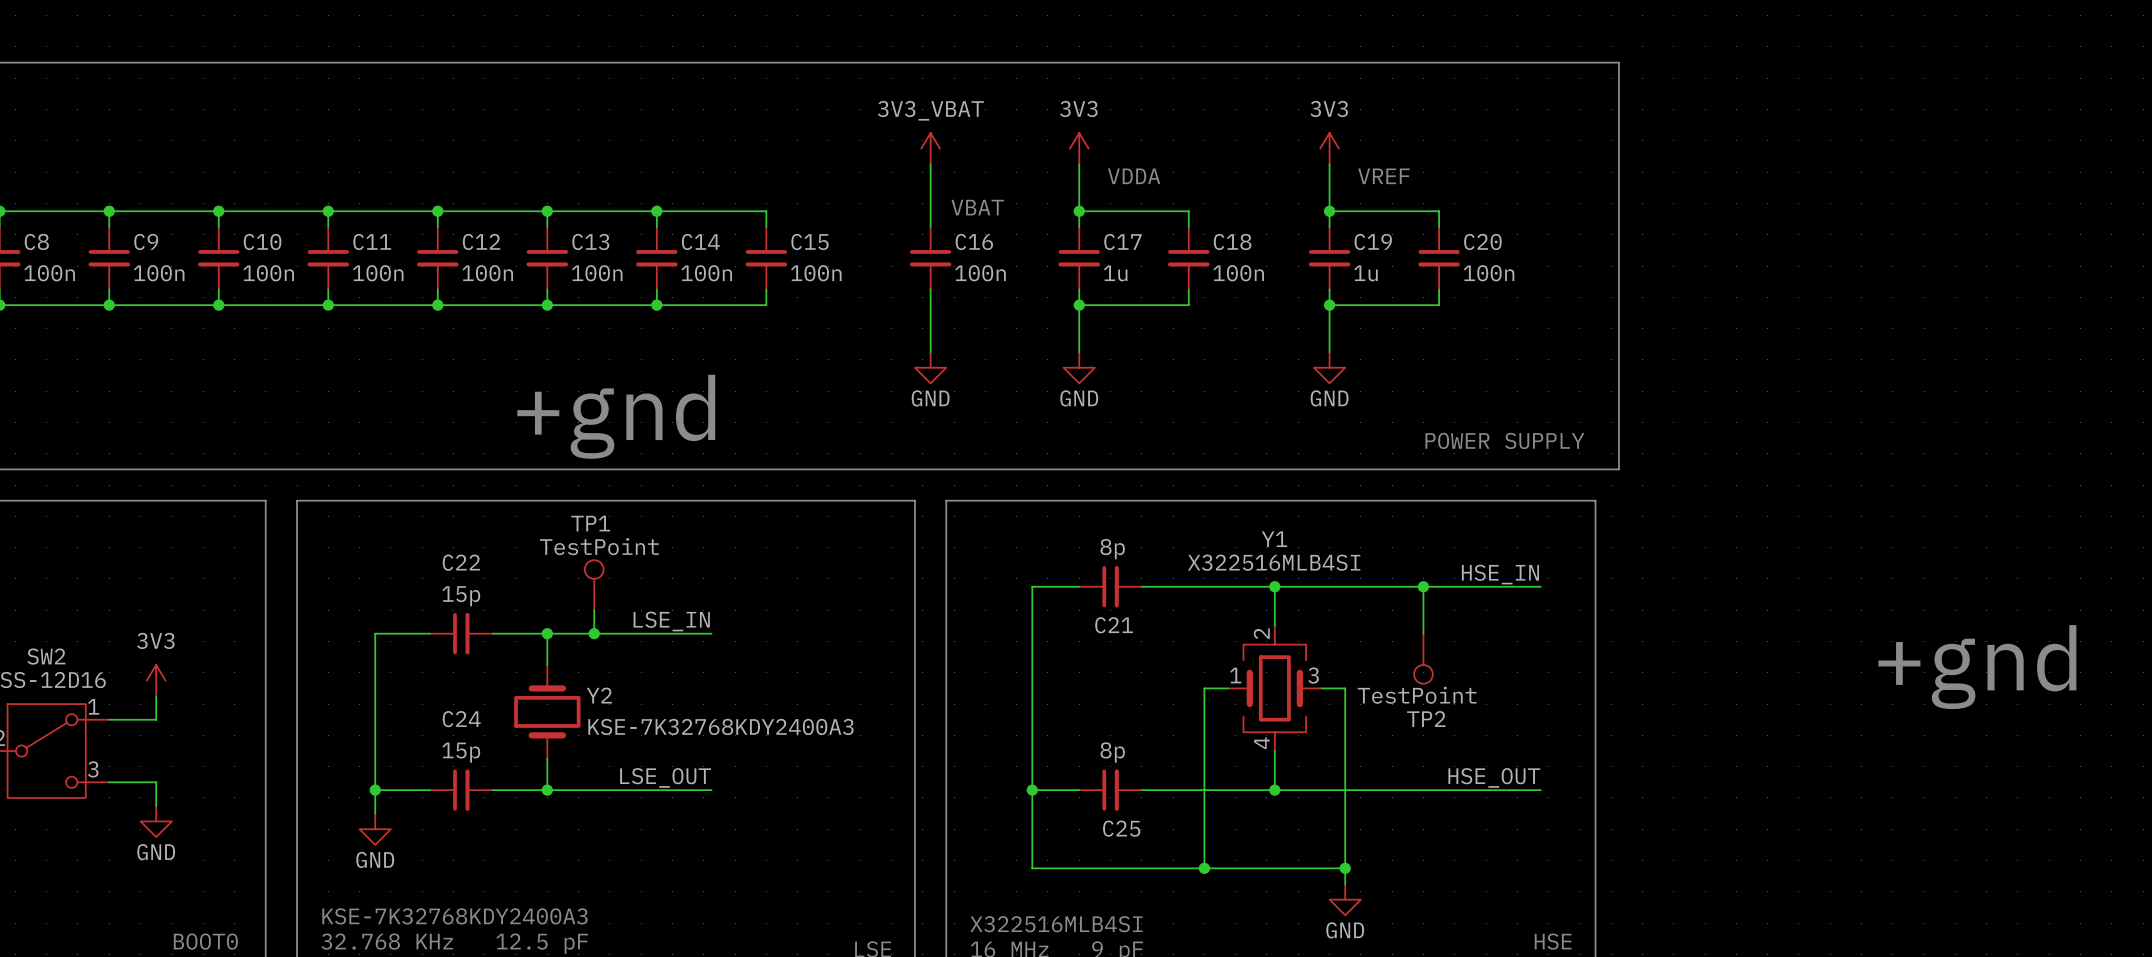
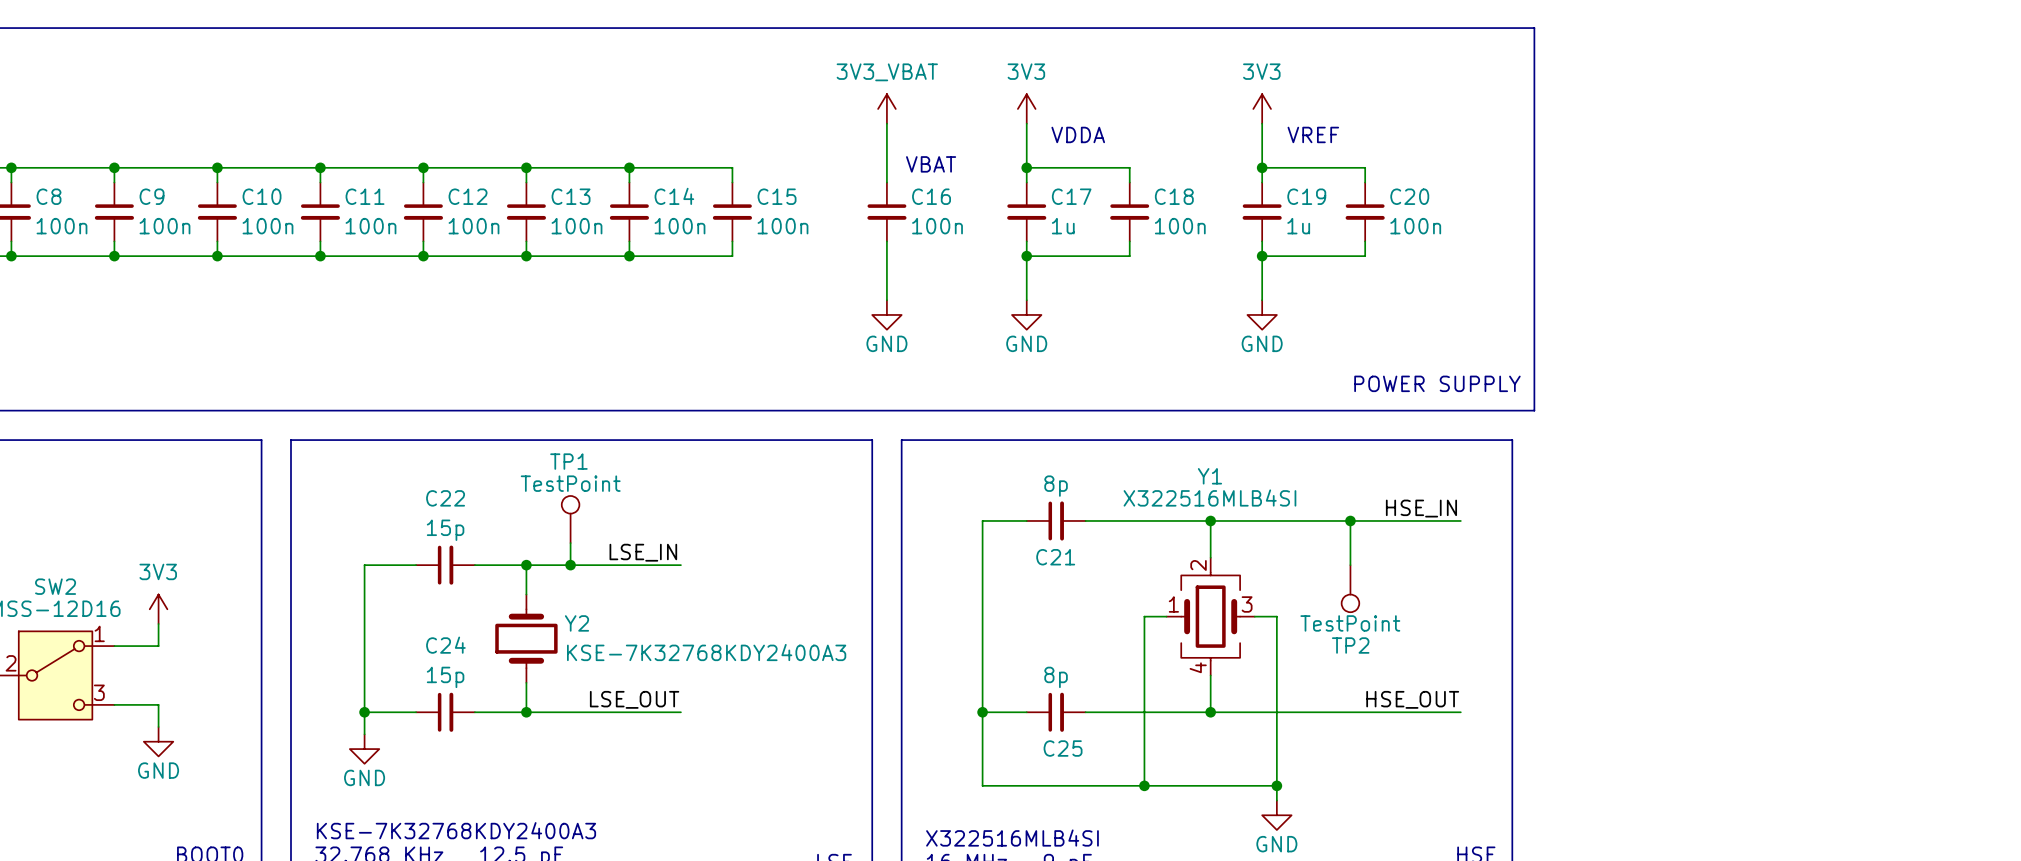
text: +gnd (616, 416) -> none
text: +gnd (1977, 667) -> none

